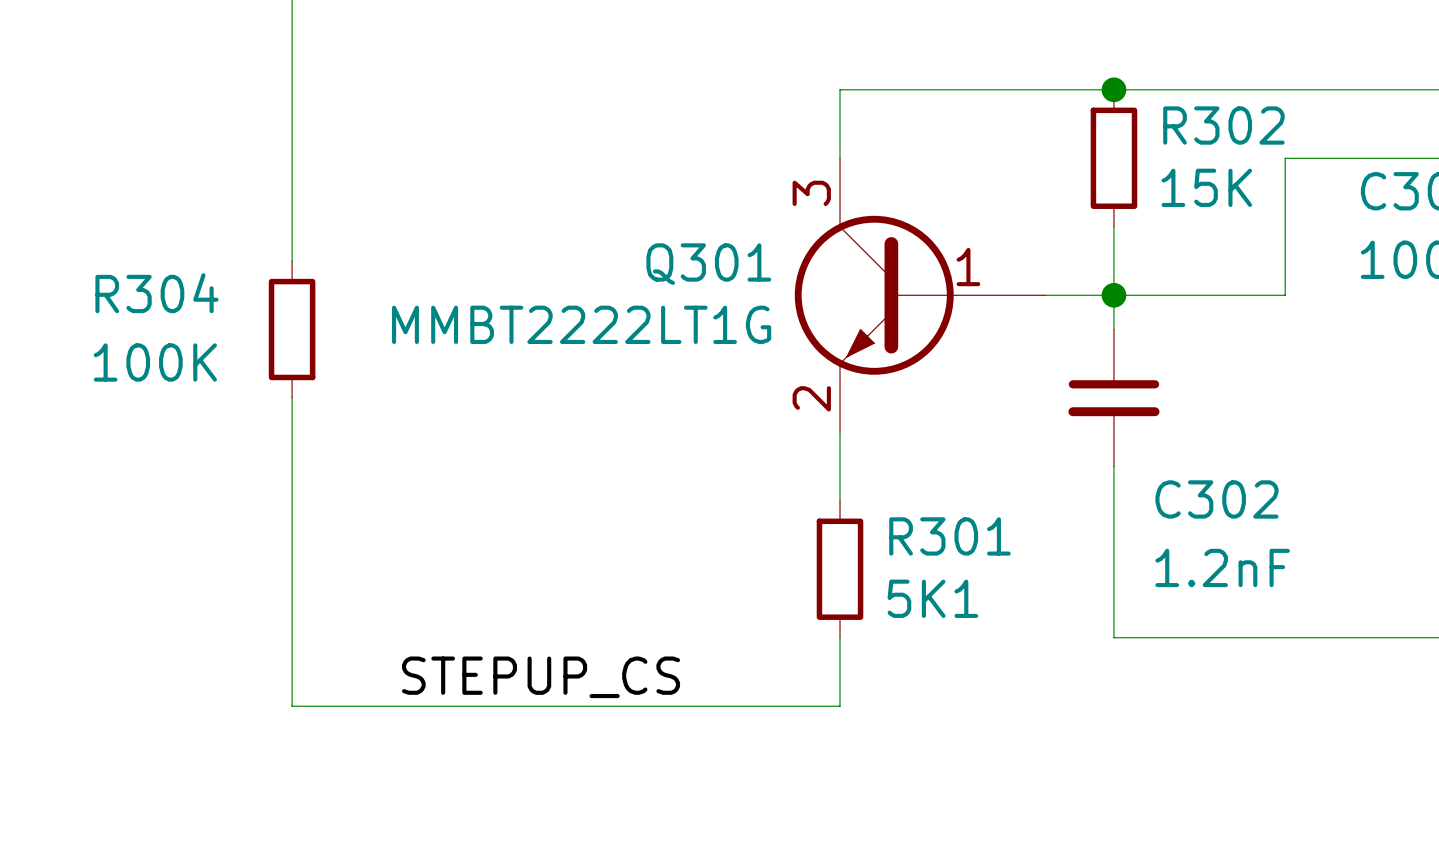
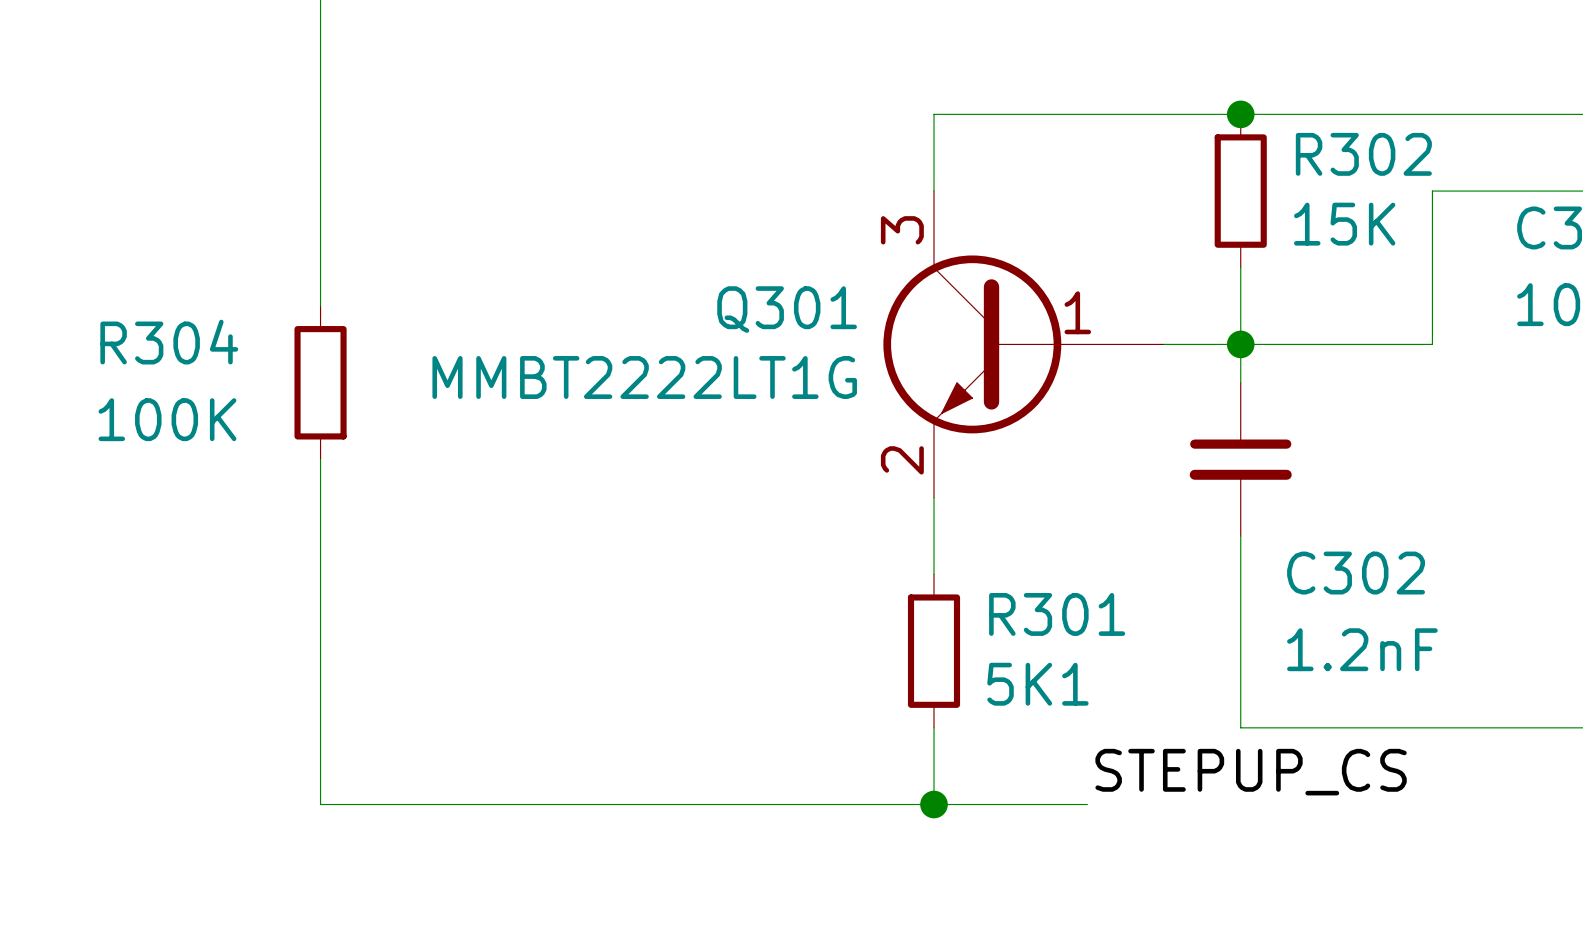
label position: STEPUP_CS (541, 677) -> STEPUP_CS (1251, 772)
wire: none -> (934, 804) (1087, 804)
junction: none -> (934, 804)

